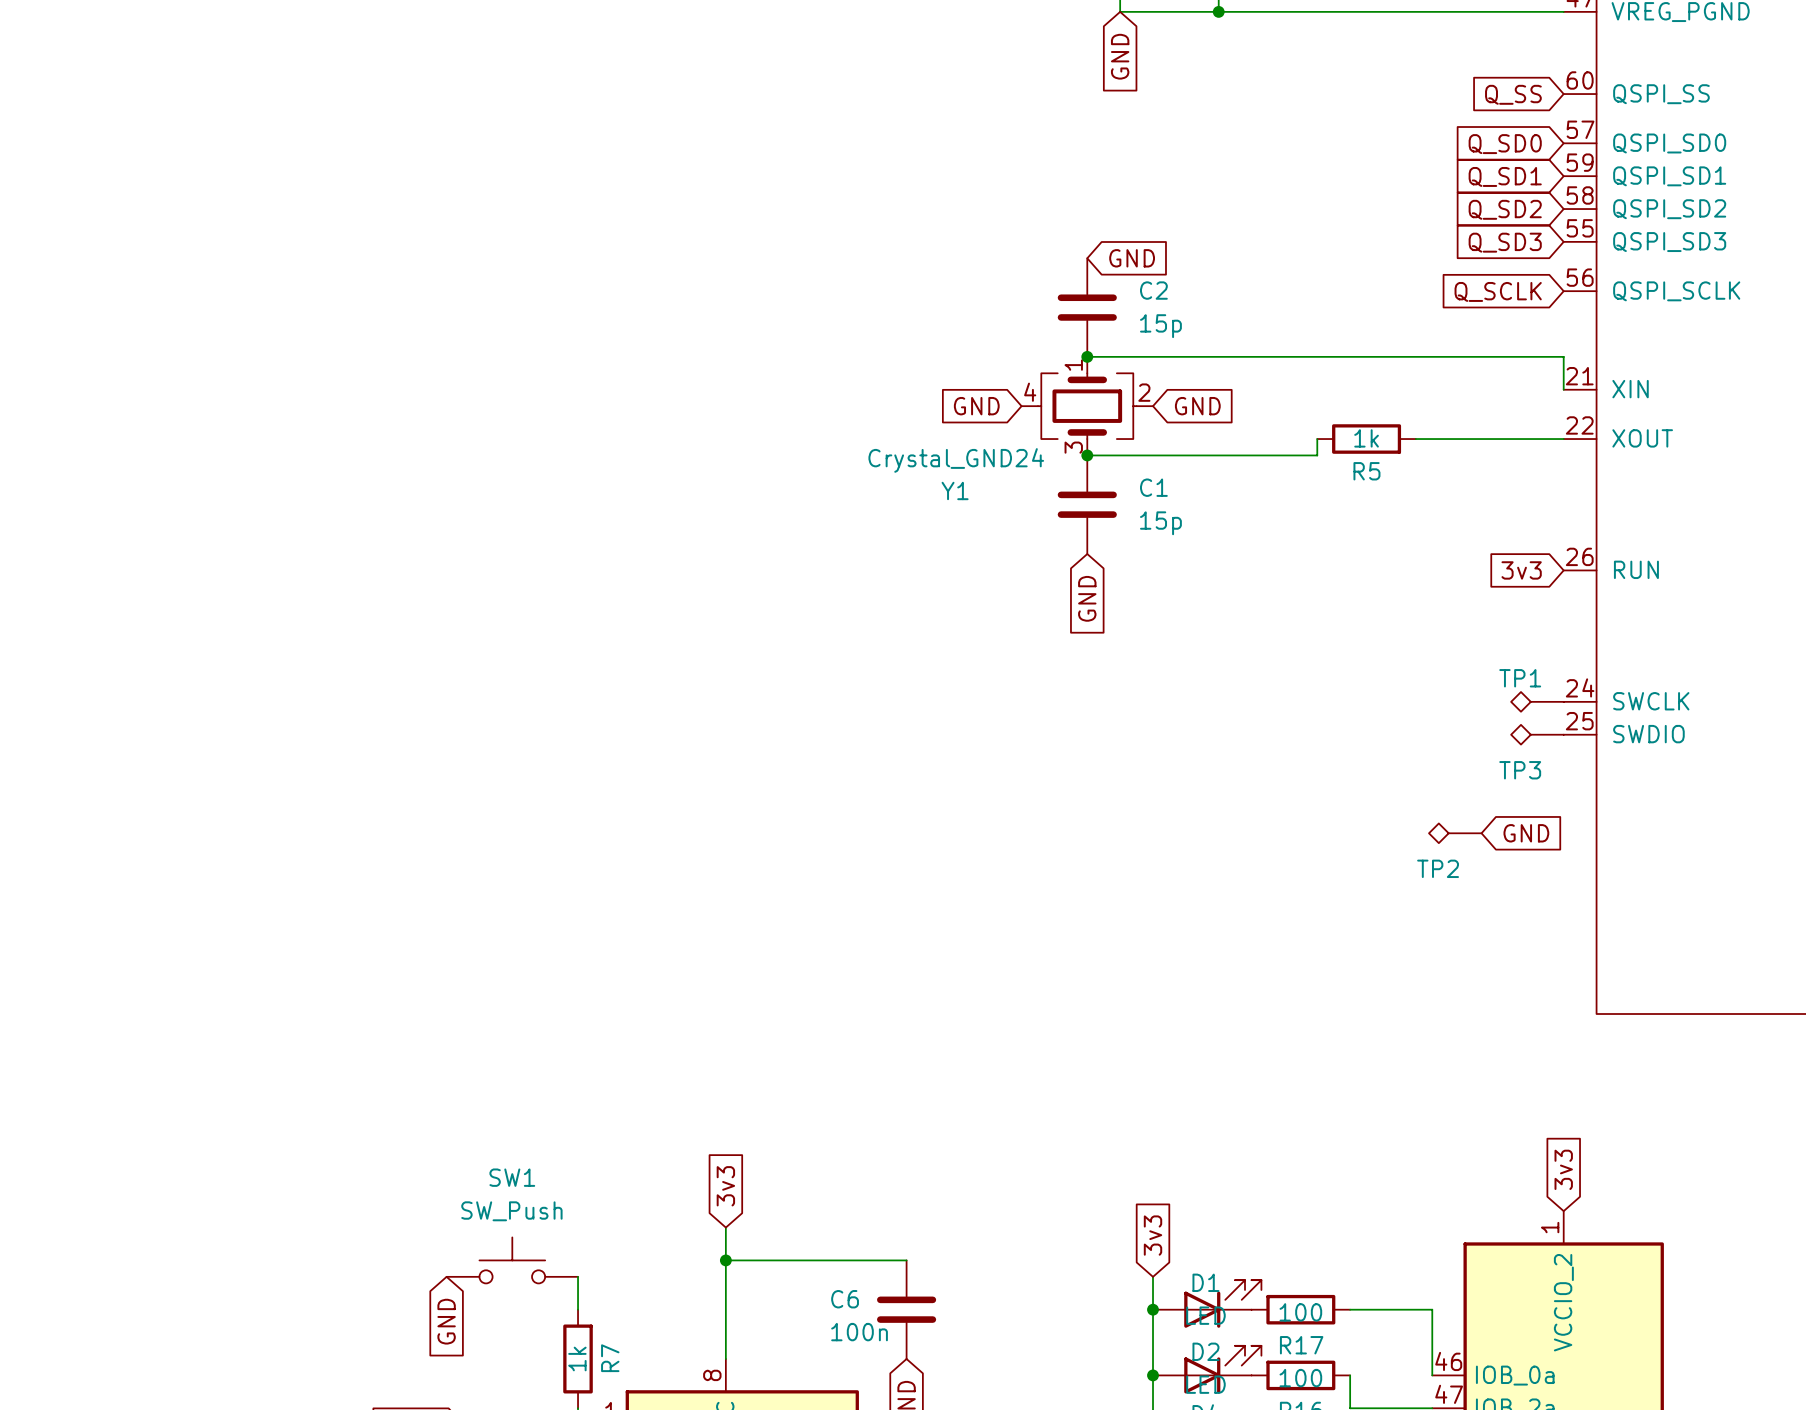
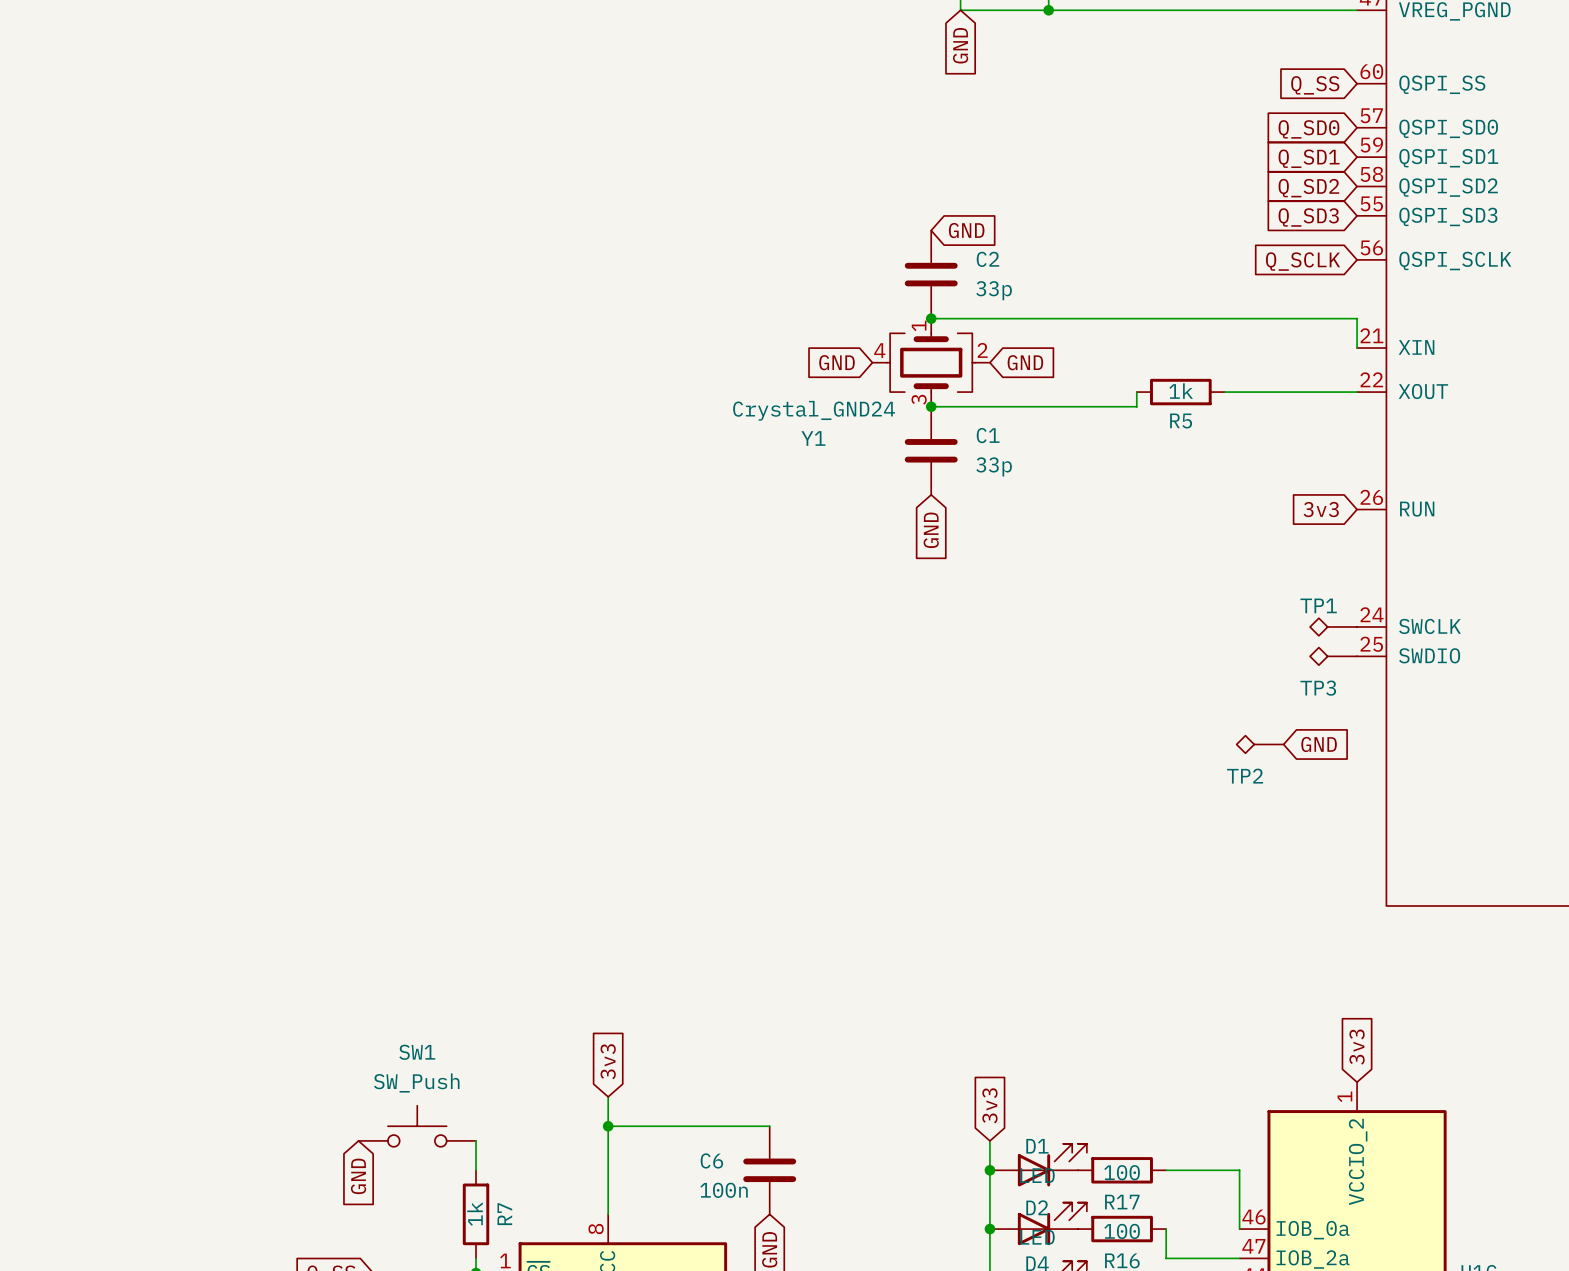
C2 value: 15p (1160, 326) -> 33p (994, 290)
C1 value: 15p (1160, 523) -> 33p (994, 466)

